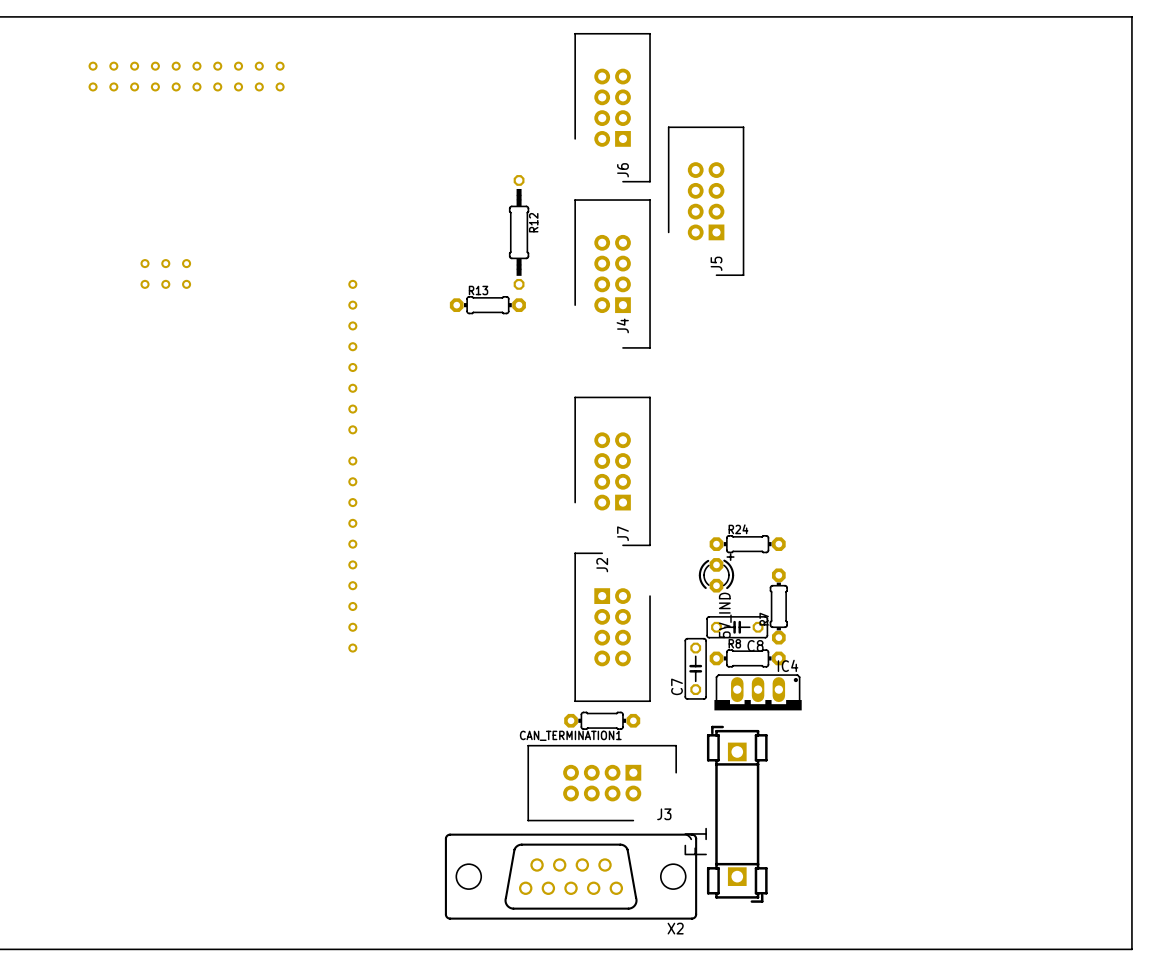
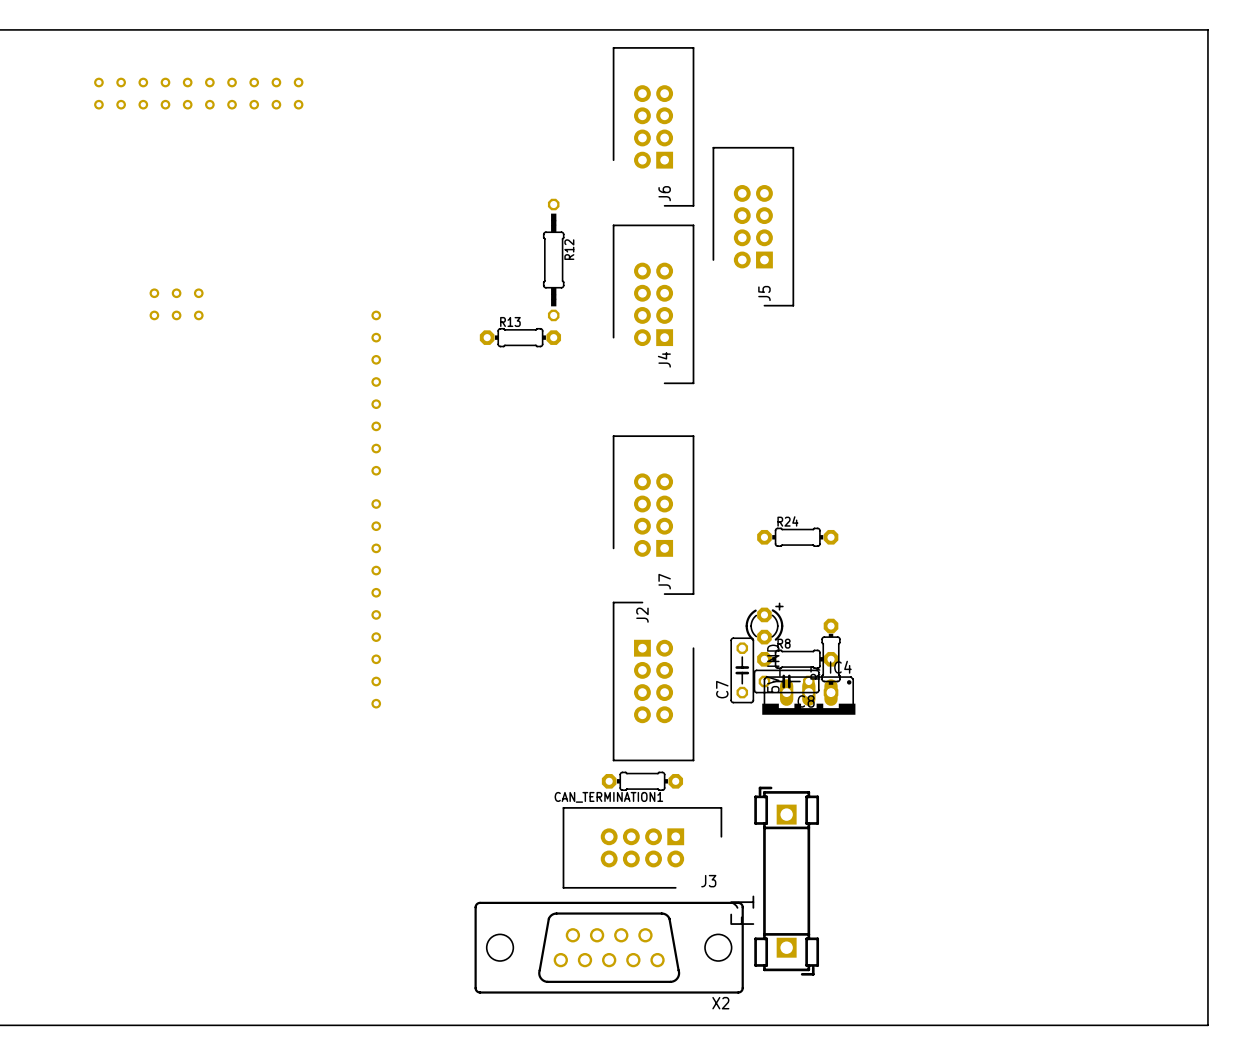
R24 position: (747, 544) -> (797, 537)
R8 position: (747, 658) -> (797, 659)
C7 position: (695, 668) -> (742, 670)
IC4 position: (758, 692) -> (808, 695)

